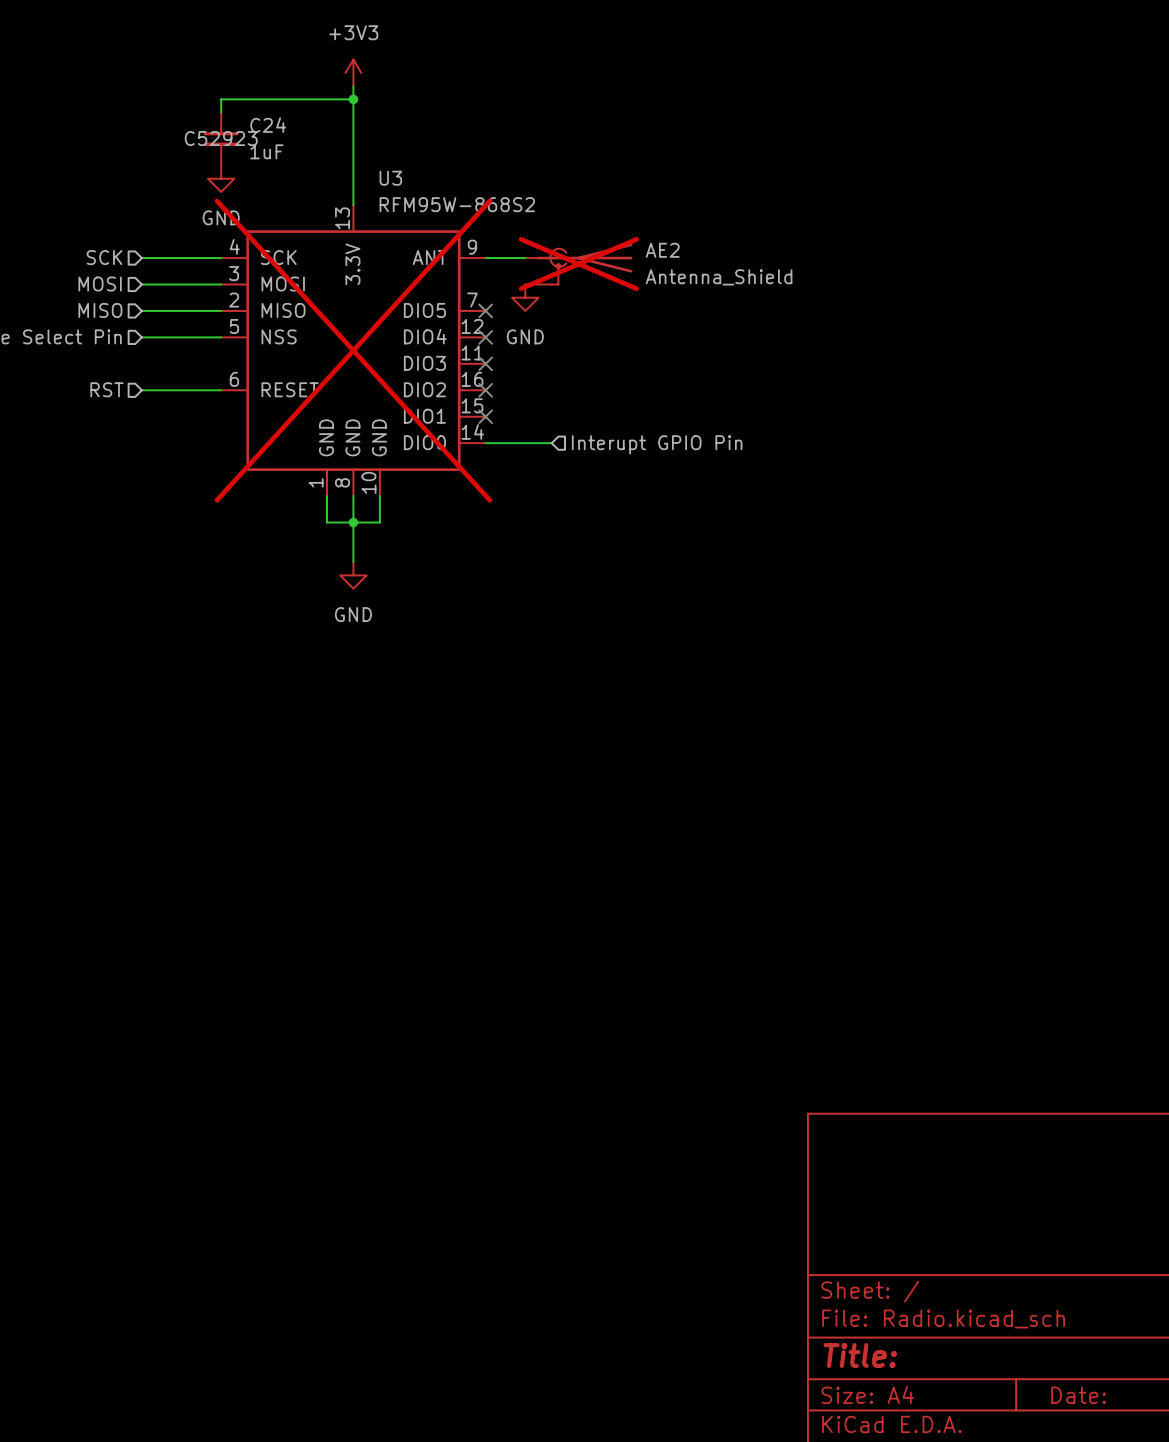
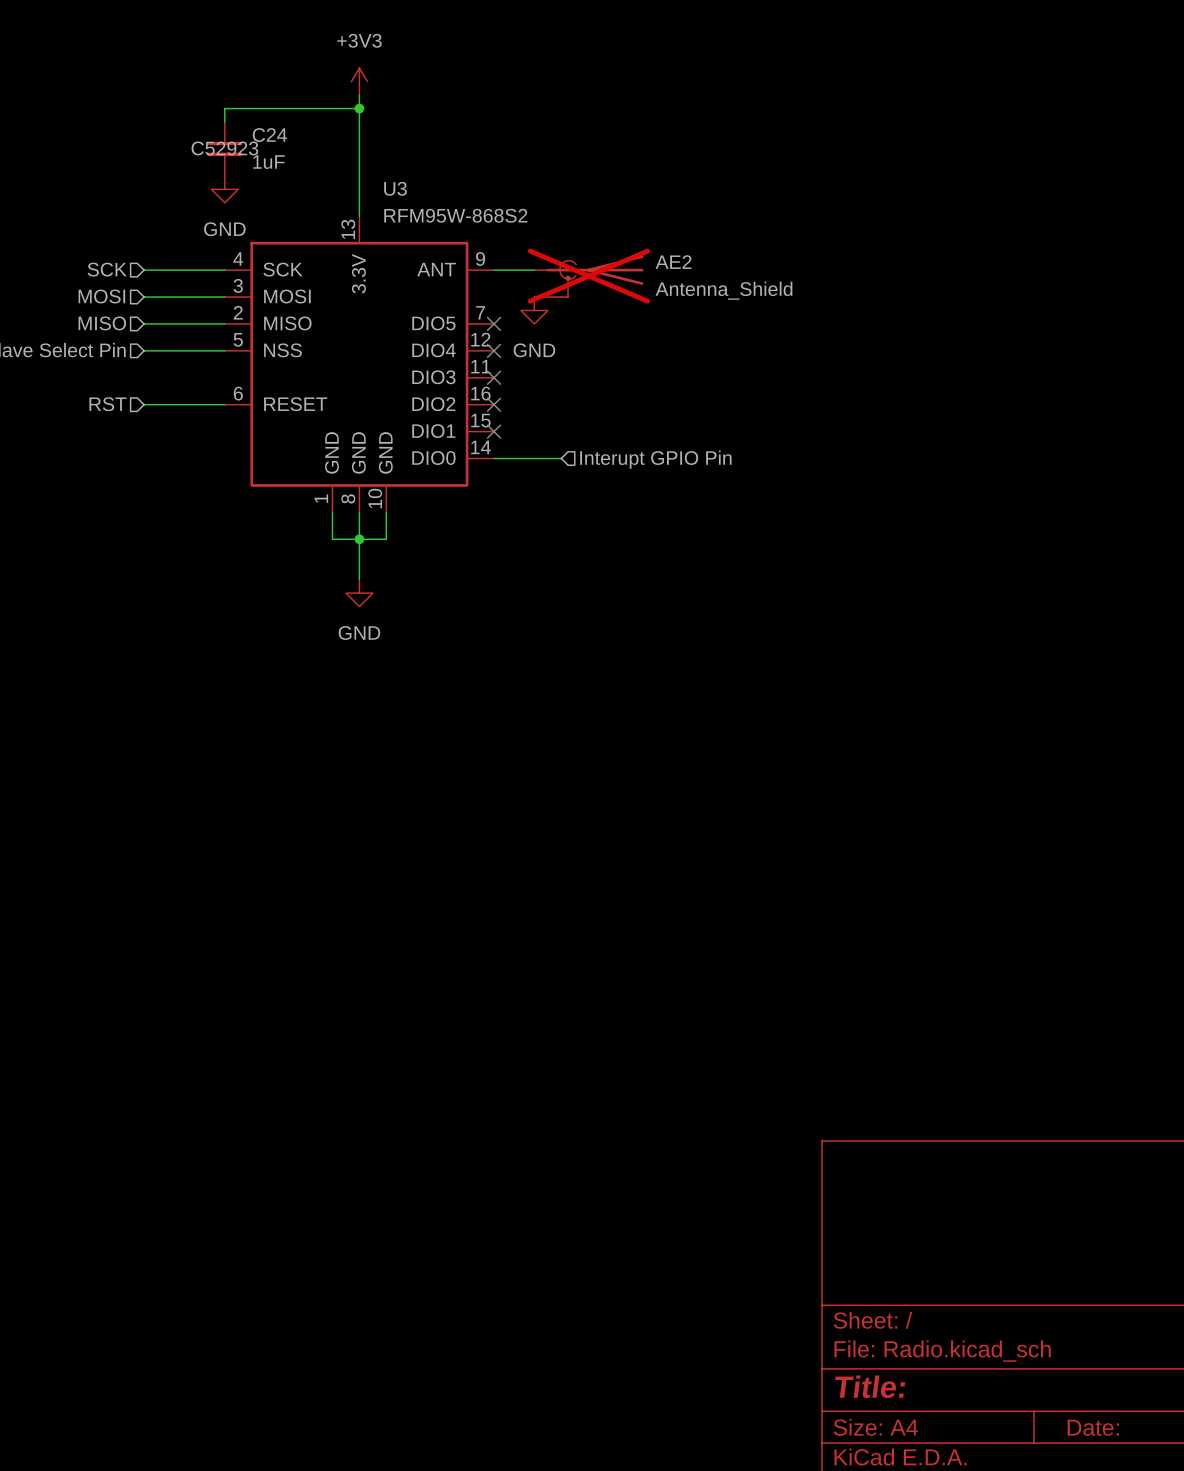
U3 do-not-place cross: (353, 350) -> none

